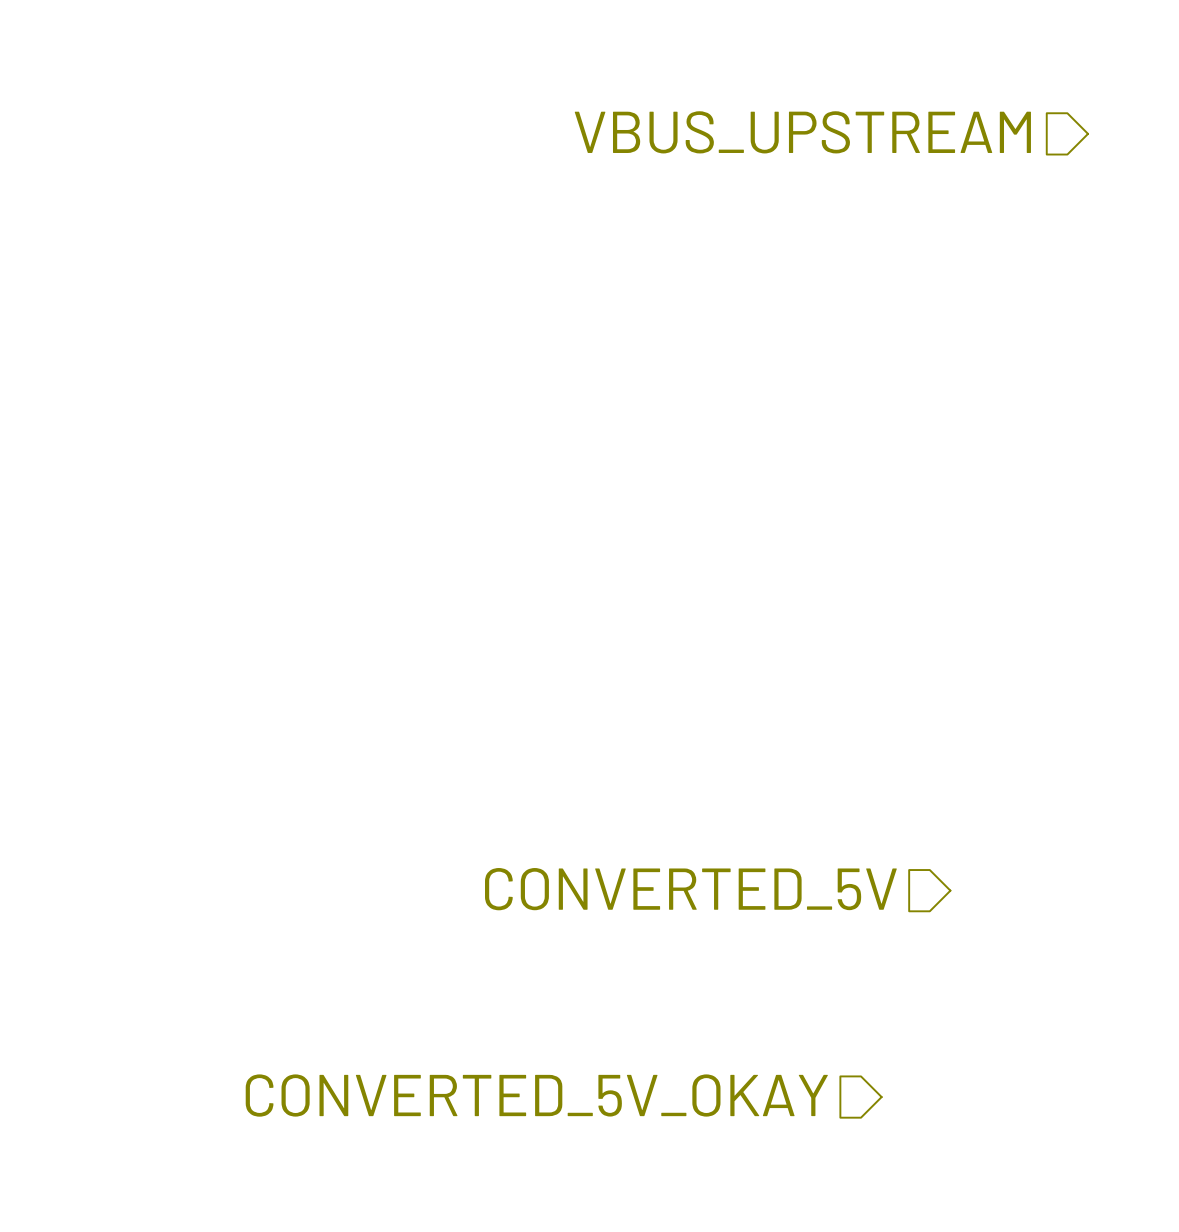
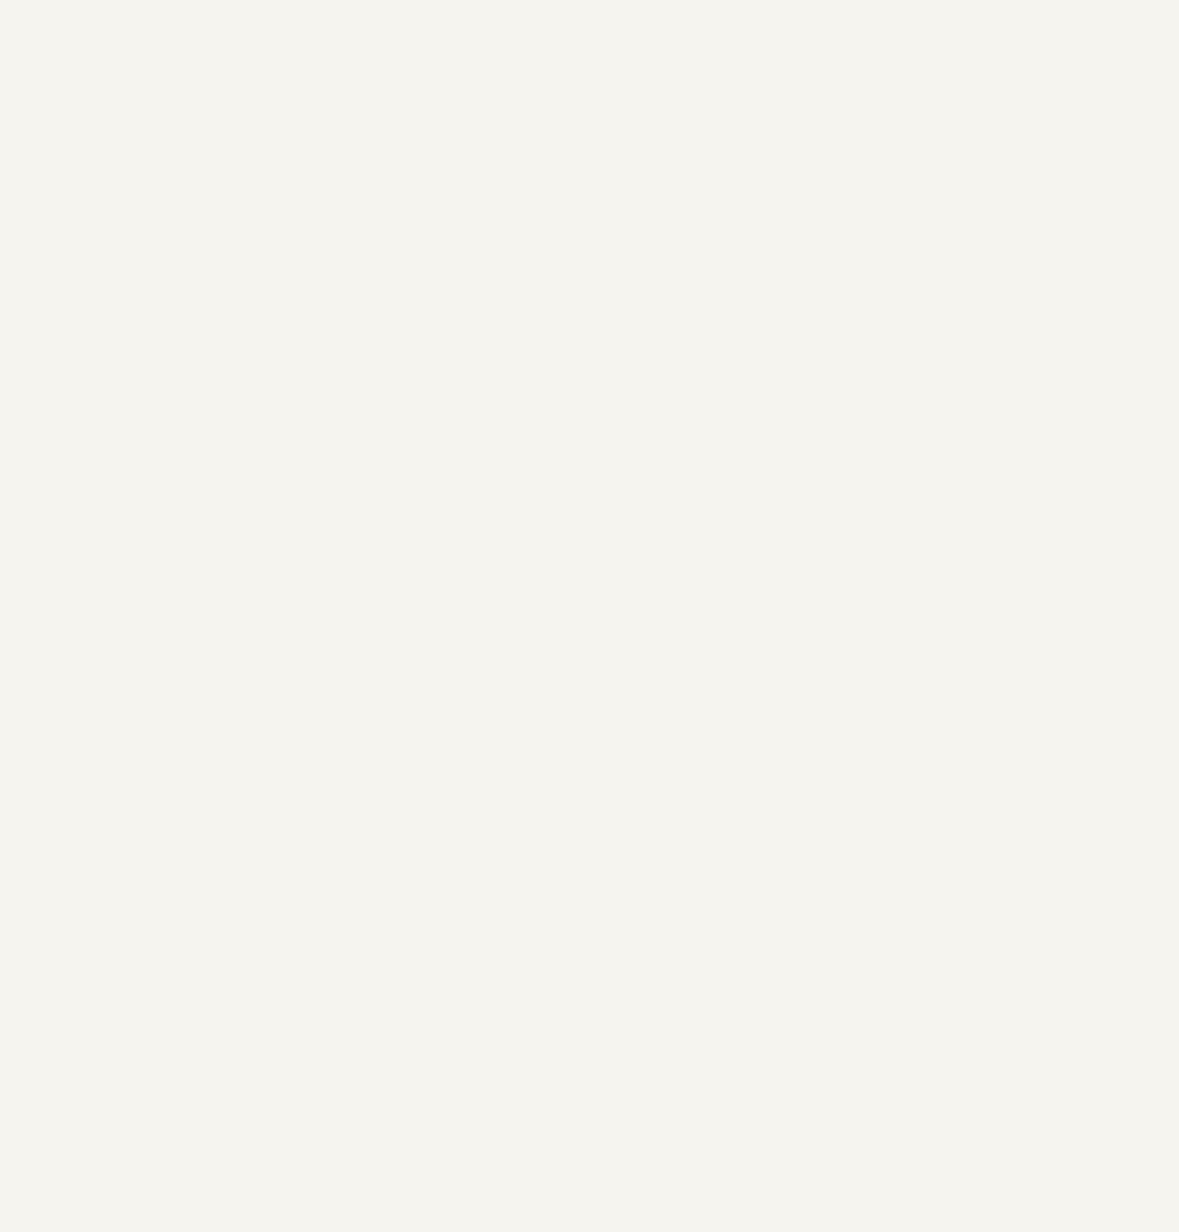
hierarchical label: VBUS_UPSTREAM (802, 132) -> none
hierarchical label: CONVERTED_5V (690, 889) -> none
hierarchical label: CONVERTED_5V_OKAY (536, 1095) -> none

